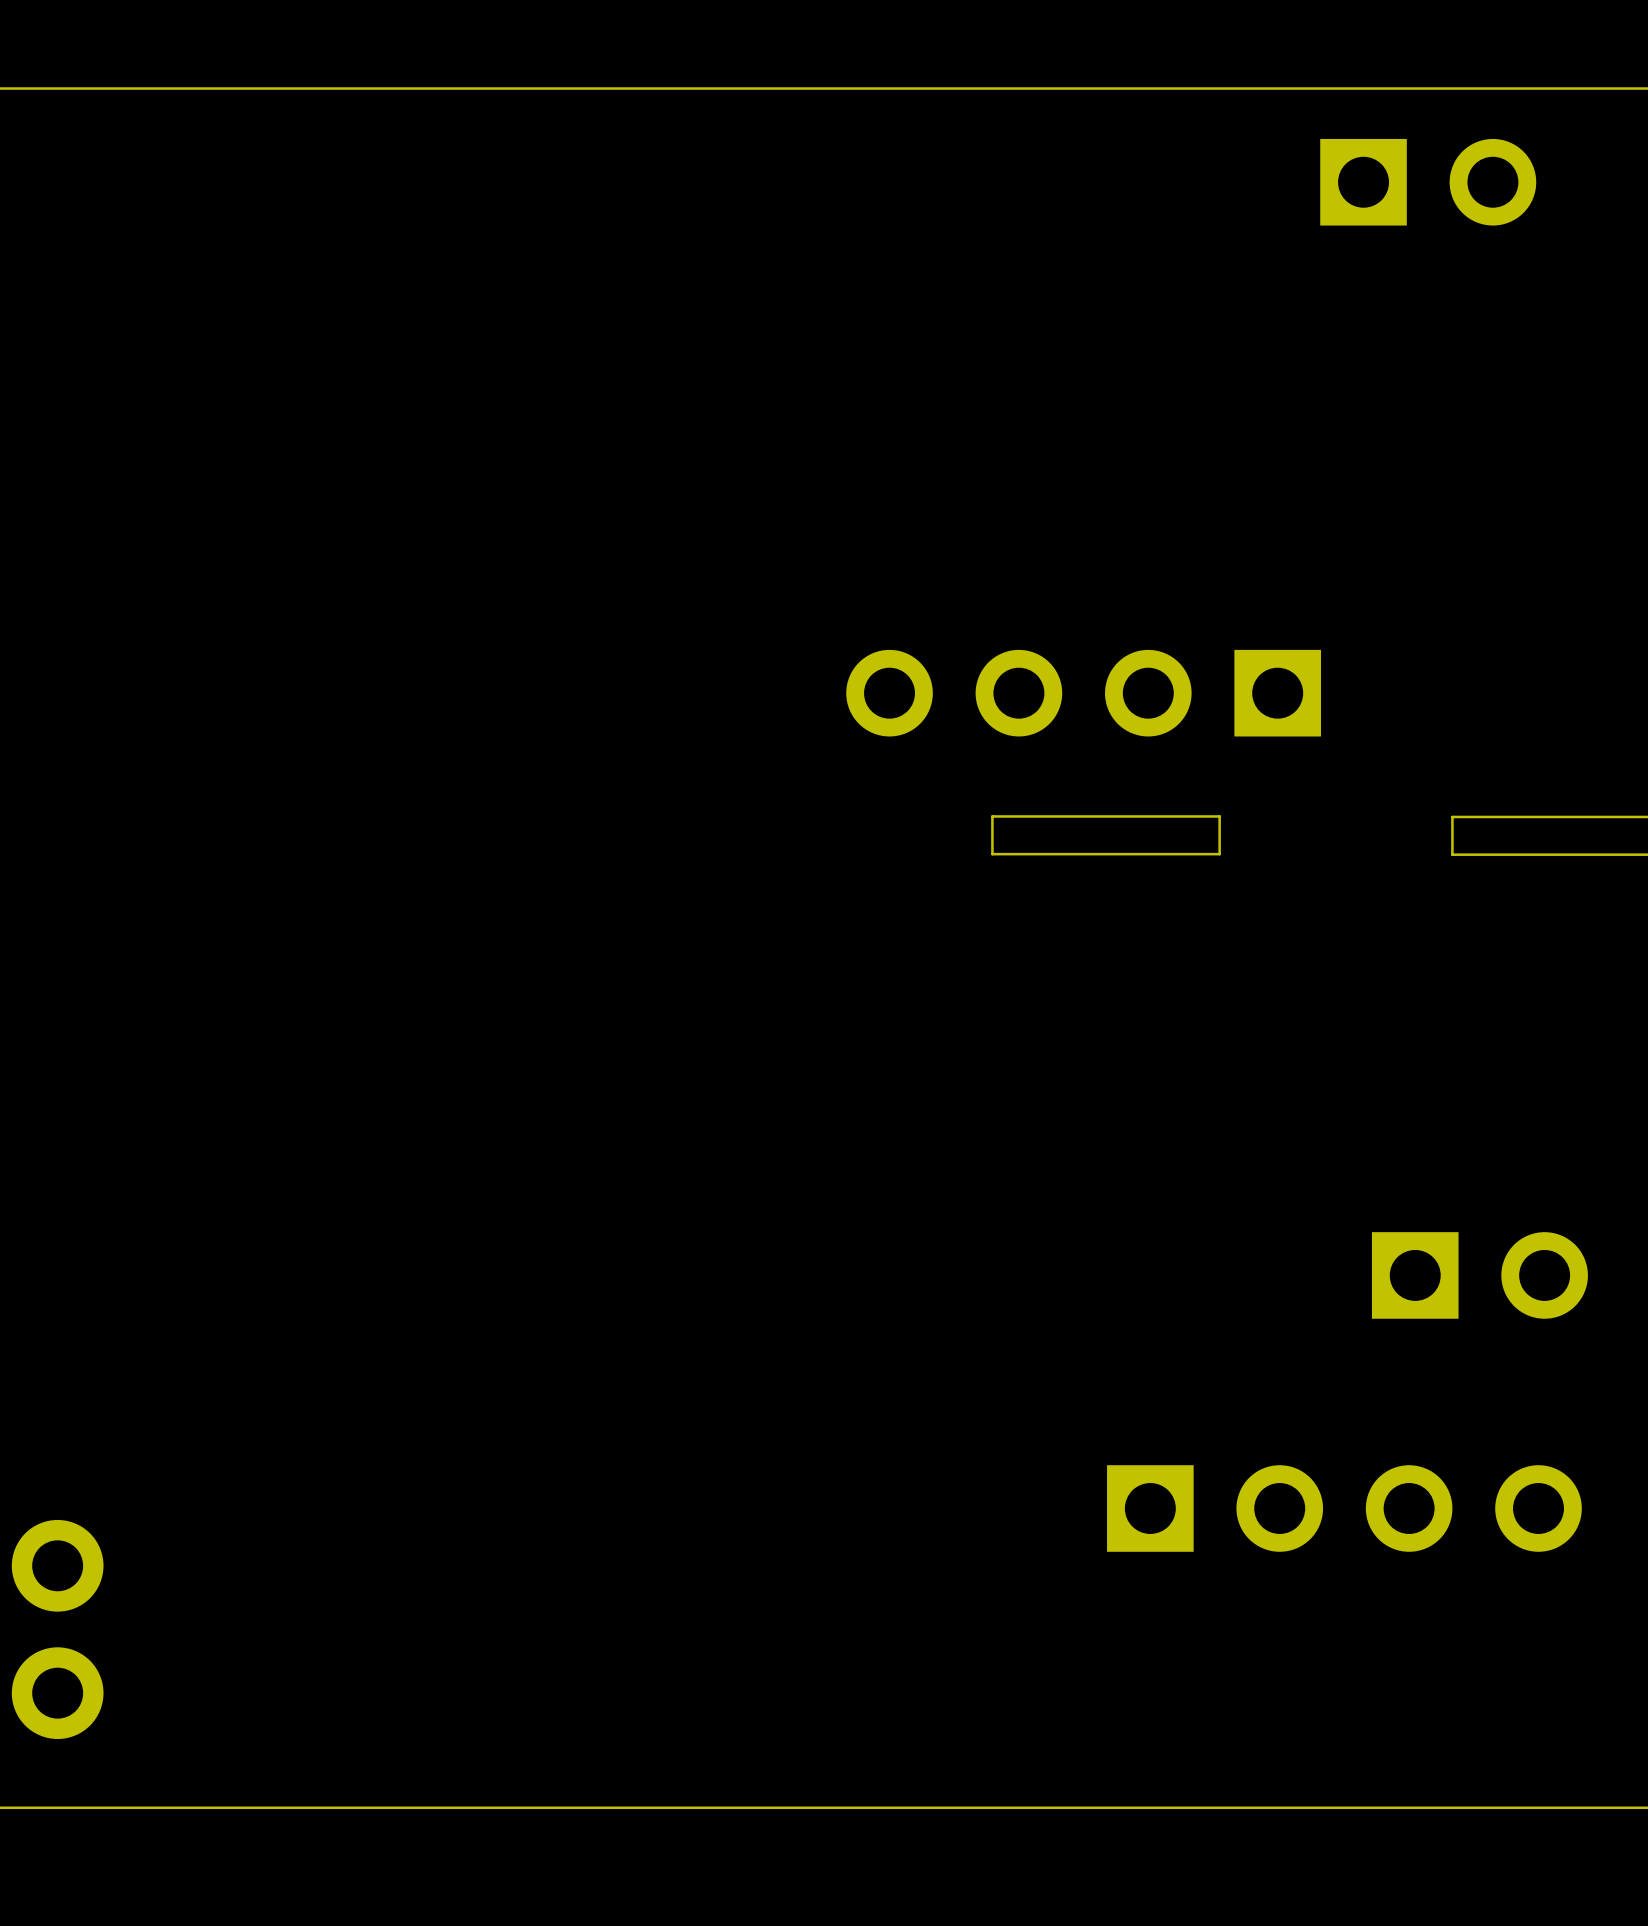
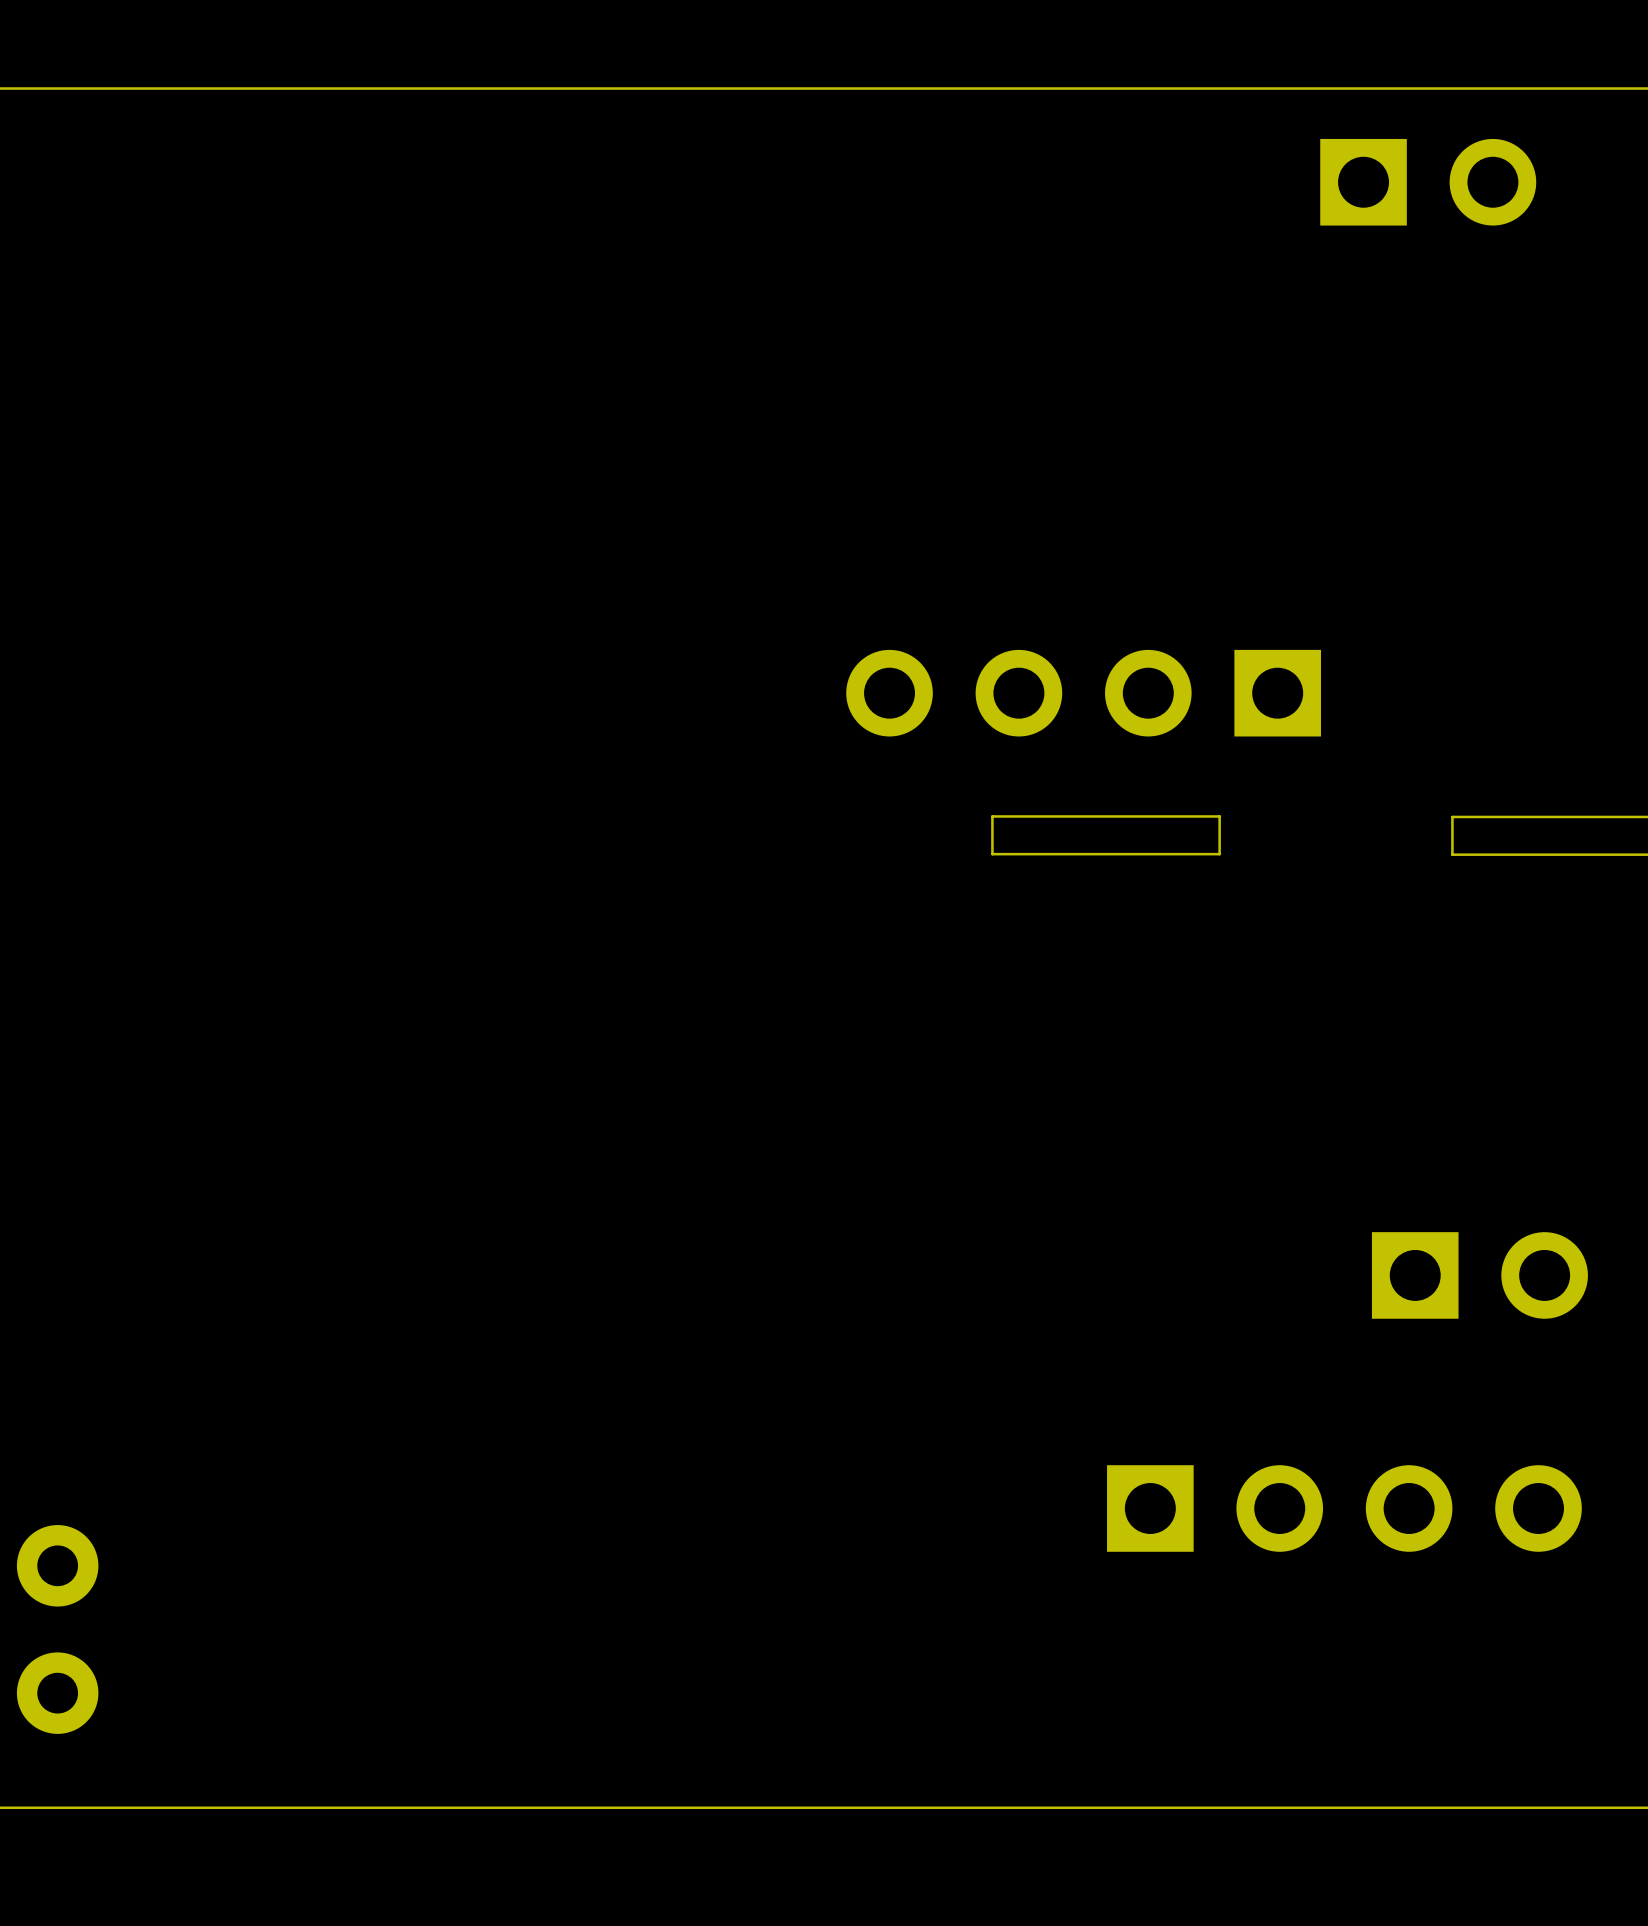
part footprint: [11, 1519, 104, 1740] -> [16, 1525, 99, 1734]

